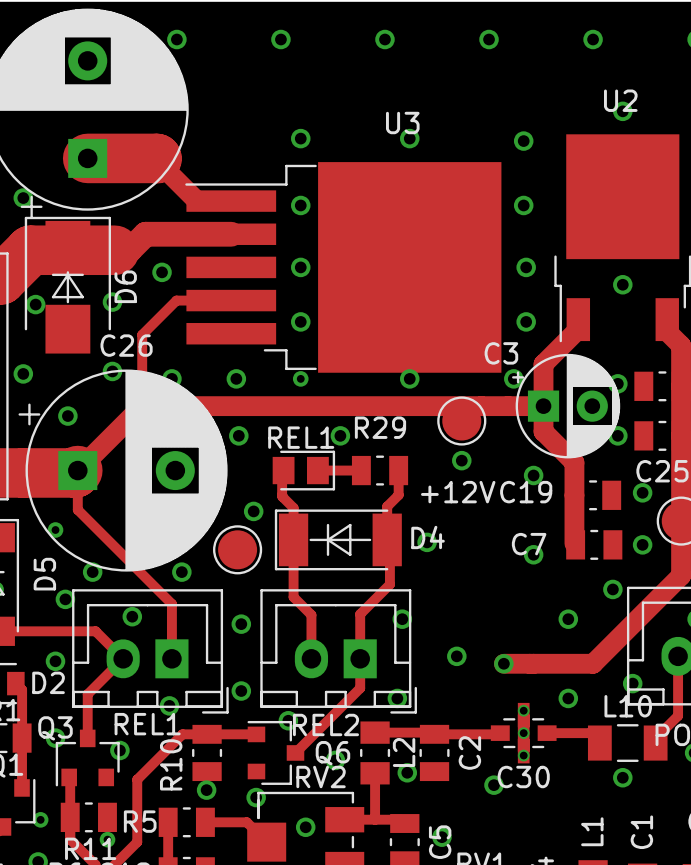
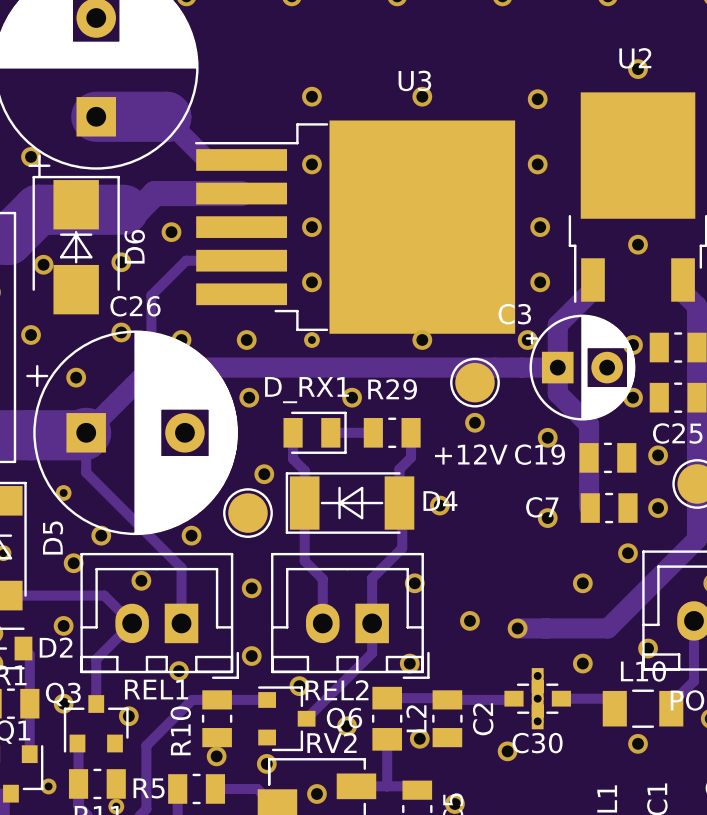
part: REL1 (303, 470) -> none
D_RX1: none -> (315, 432)

